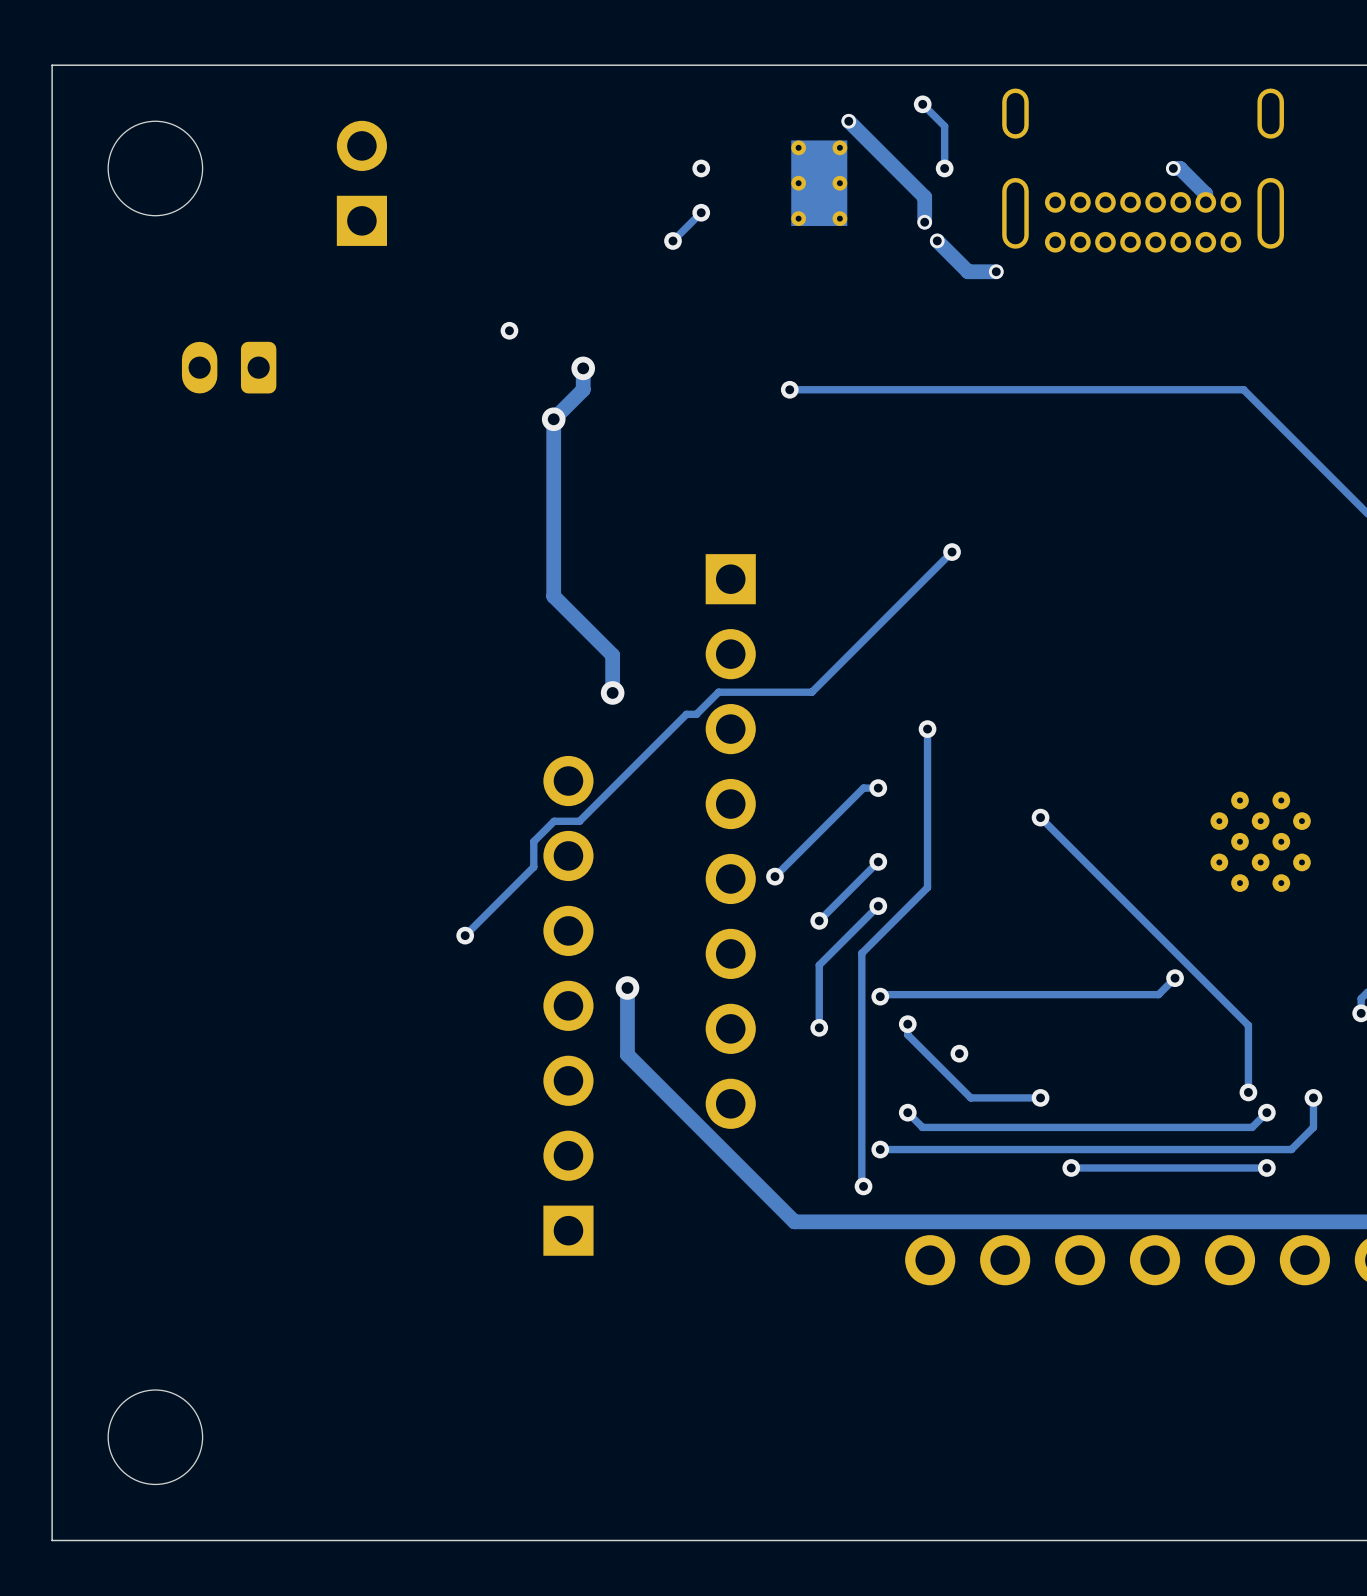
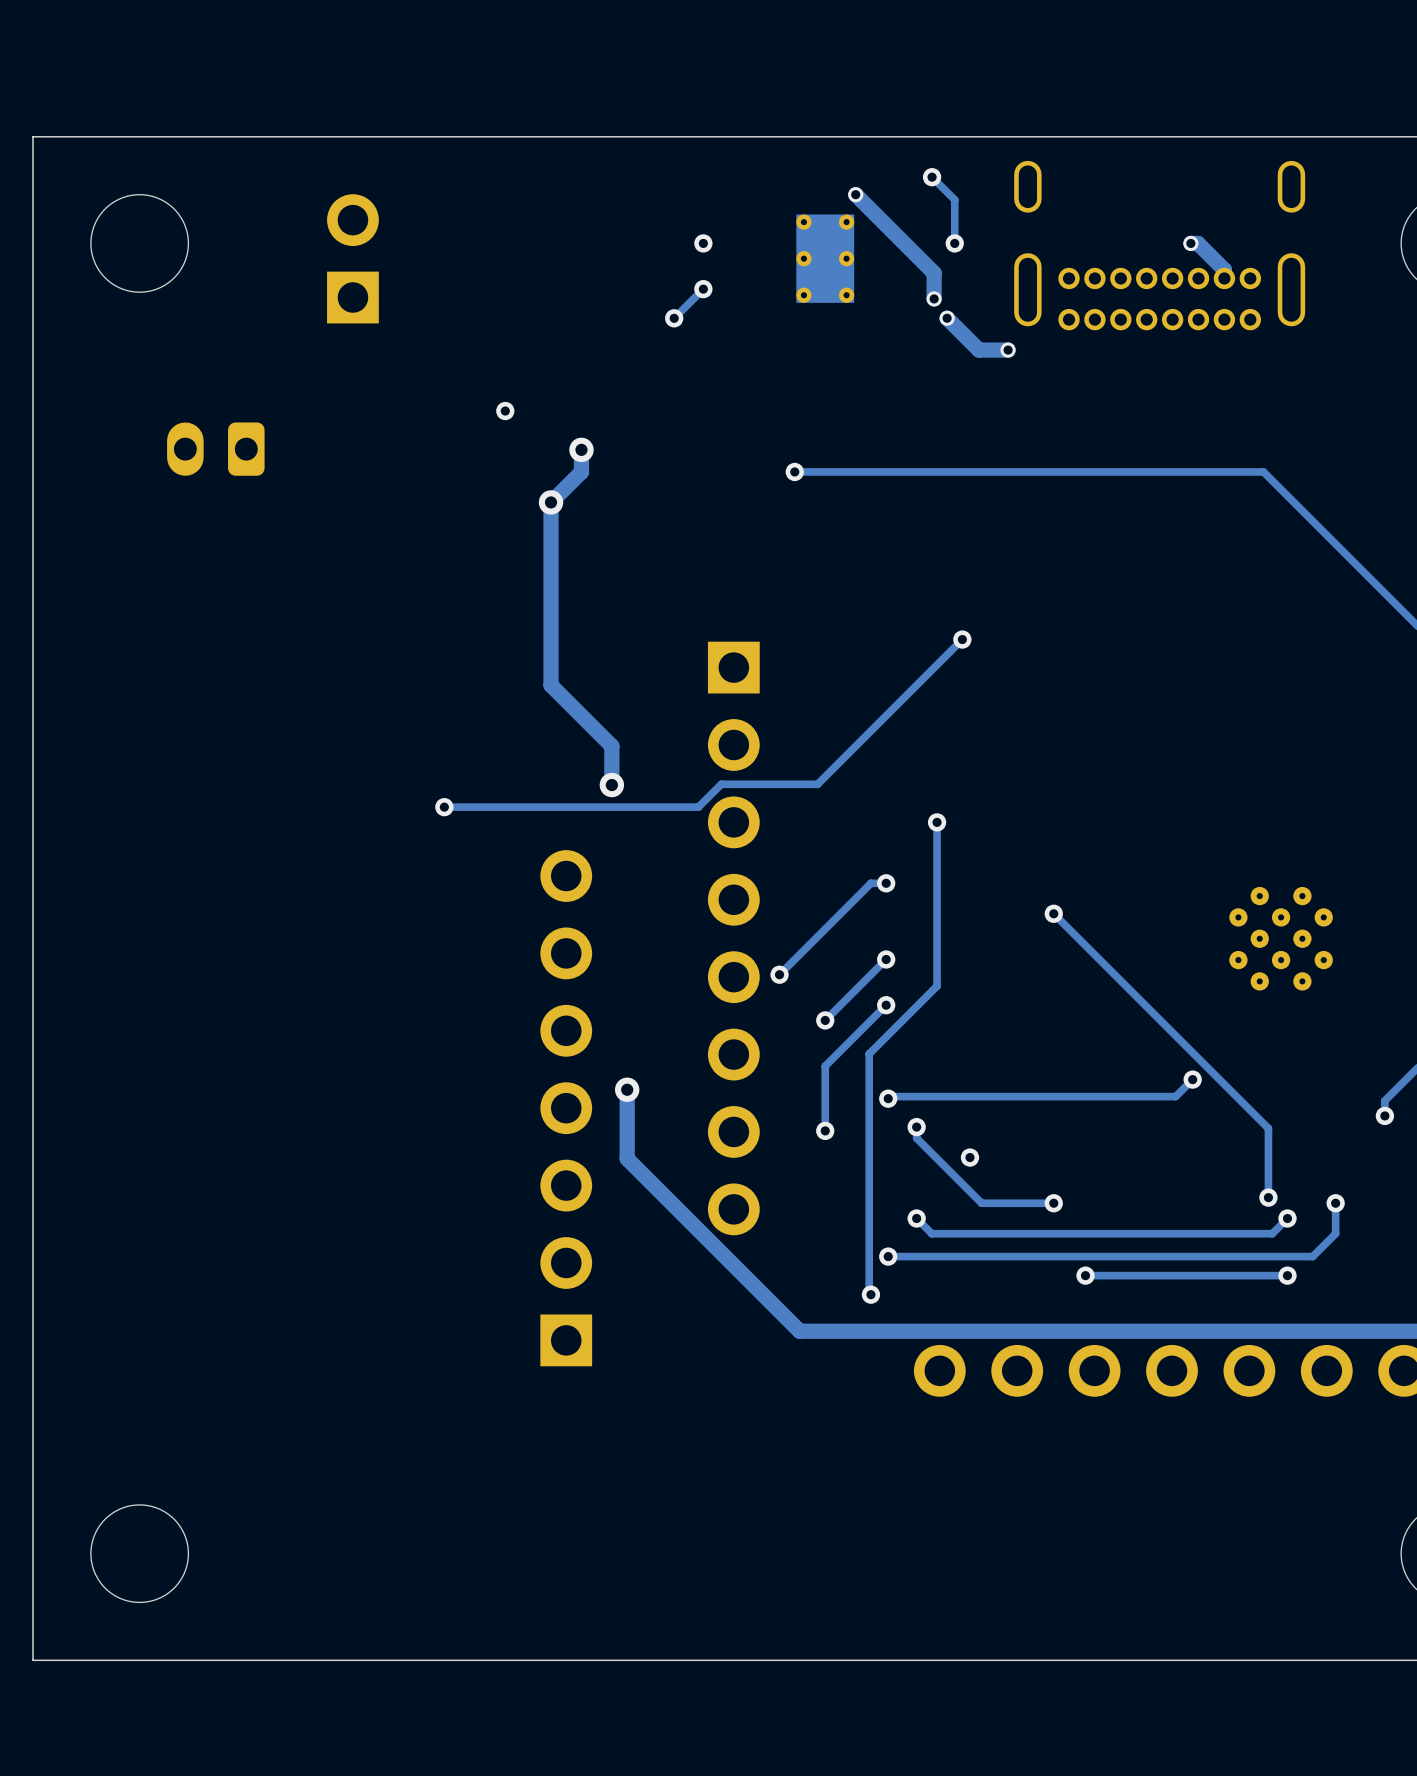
via: none -> (444, 807)
track: (686, 714) (579, 821) (554, 821) (533, 841) (533, 867) (465, 935) -> (688, 807) (444, 807)
via: (465, 935) -> none

